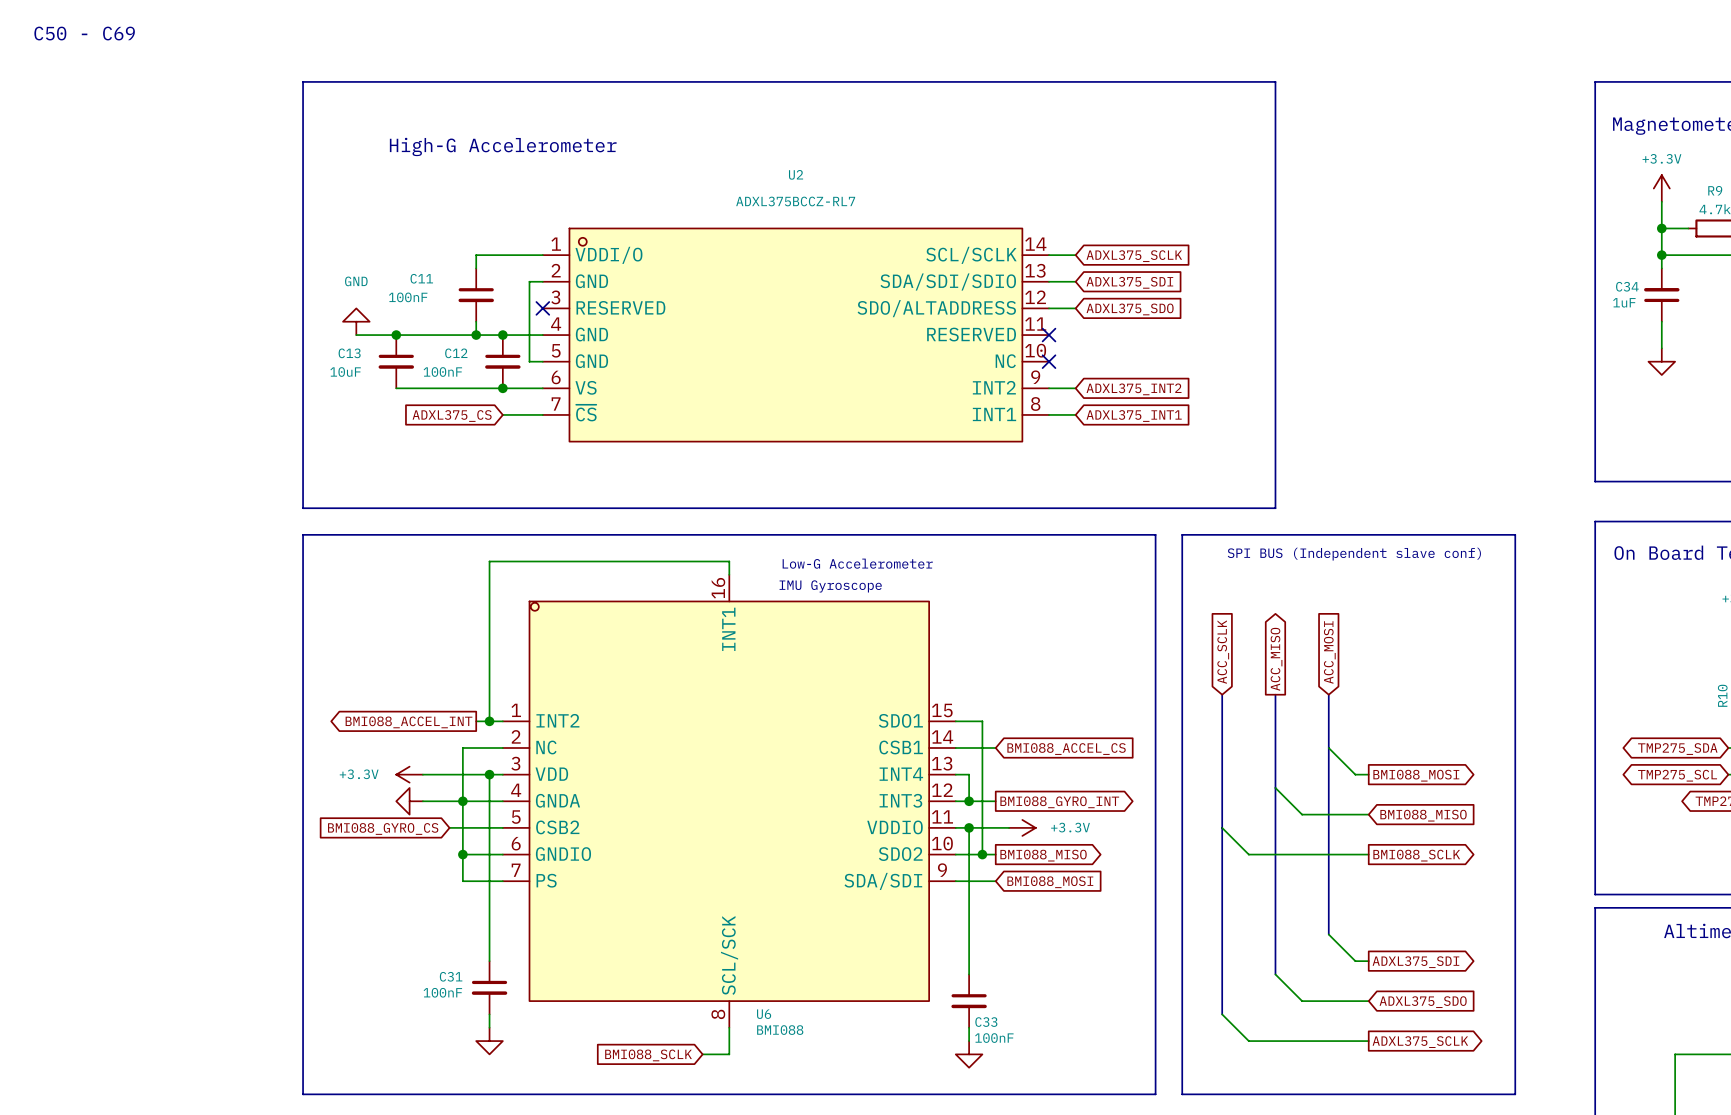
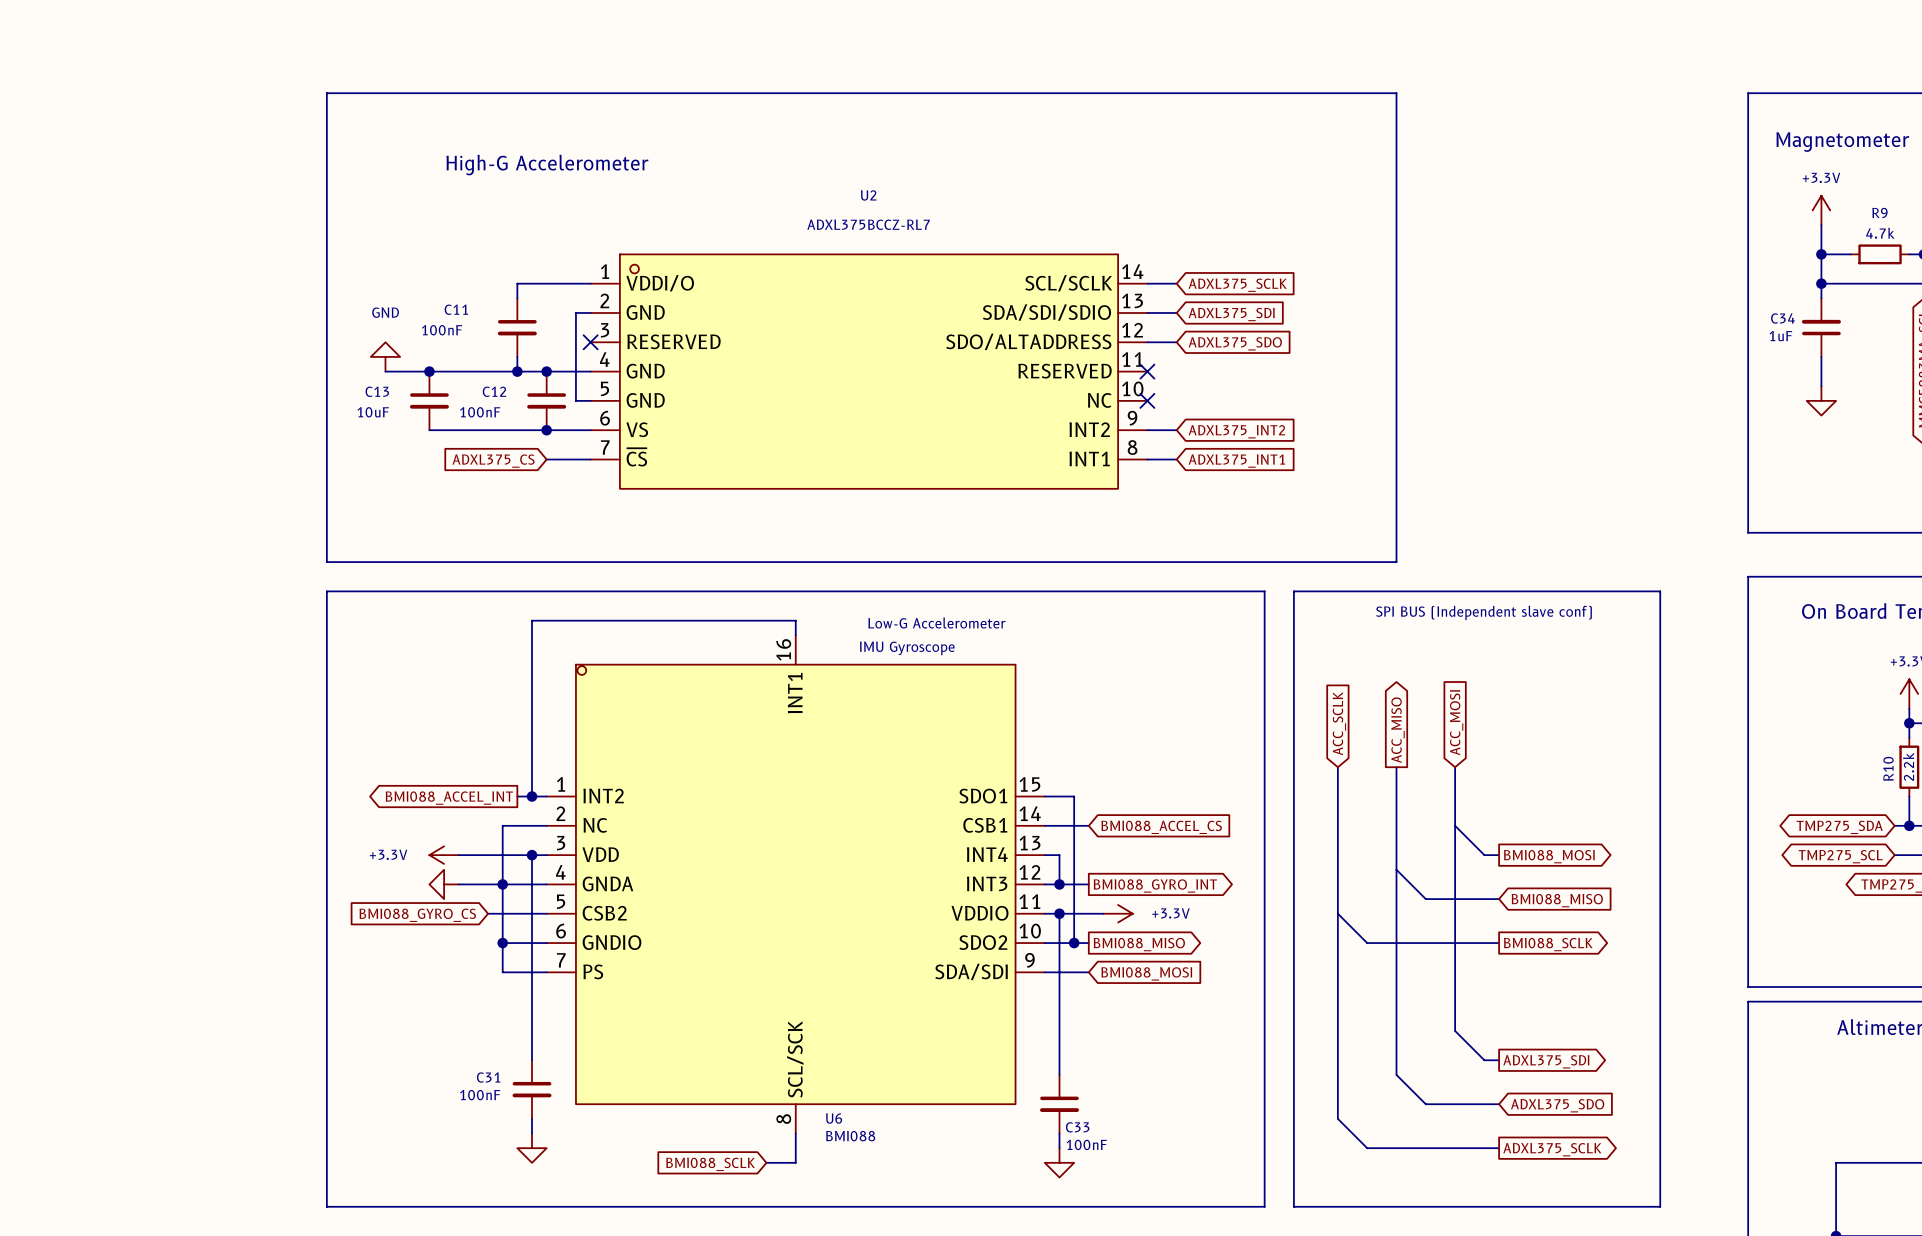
text: C50 - C69 (84, 33) -> none

